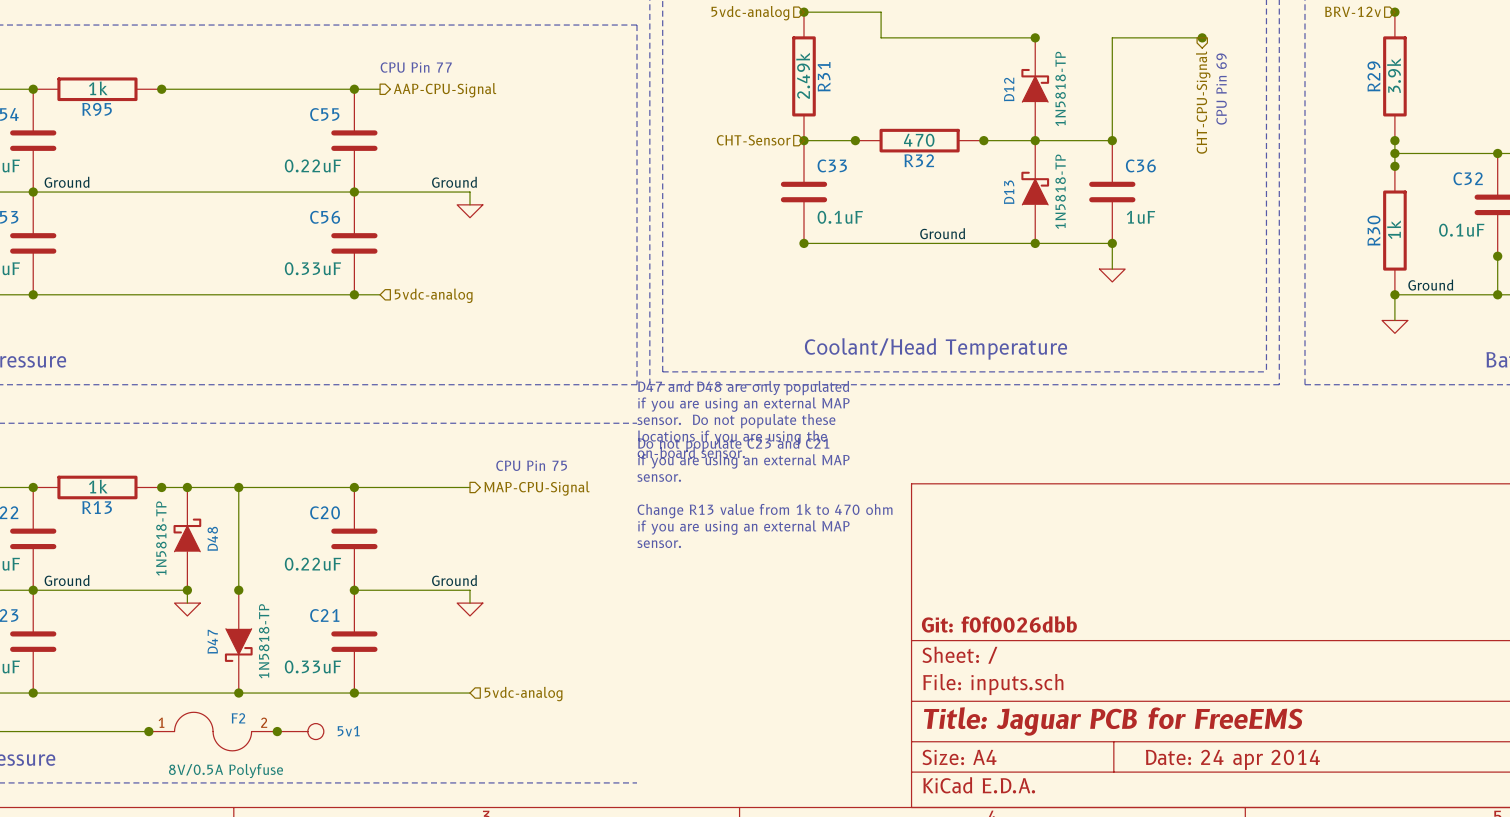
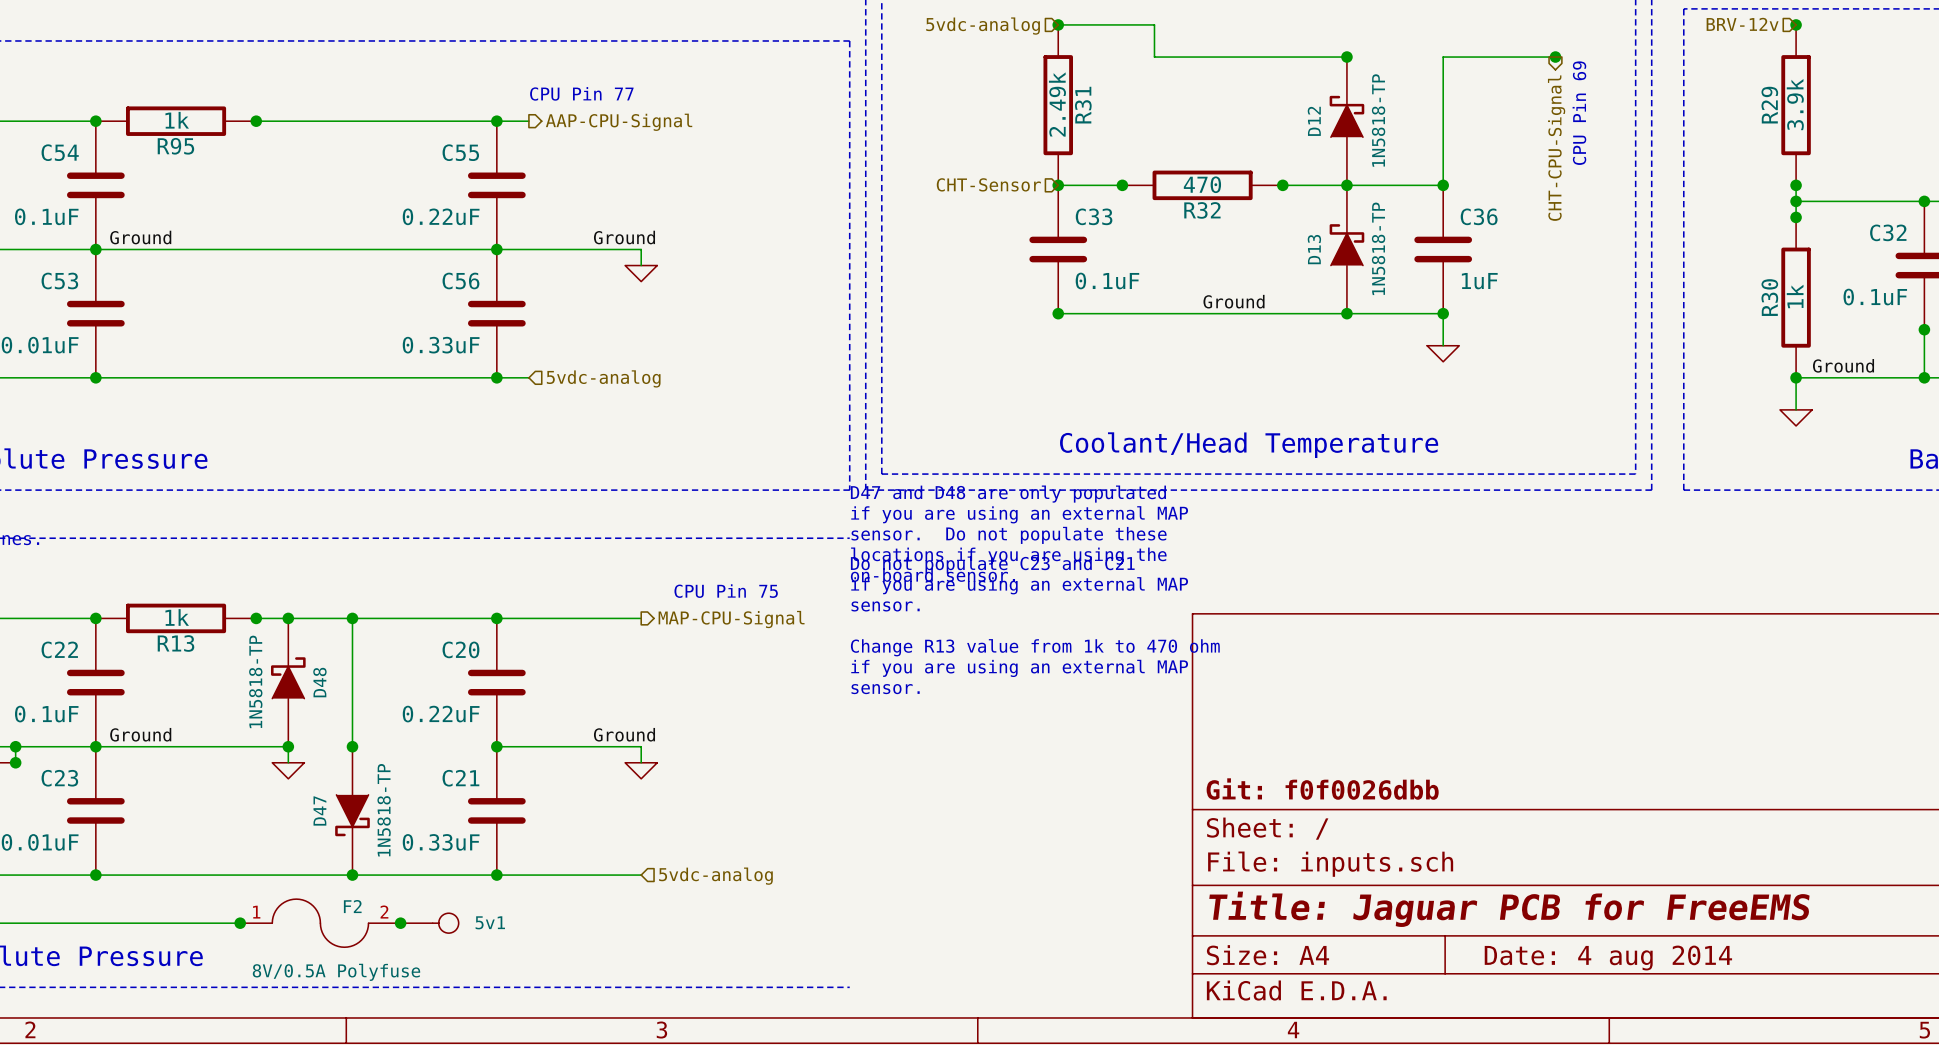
title block: Date: 24 apr 2014 (1232, 759) -> Date: 4 aug 2014 (1608, 958)

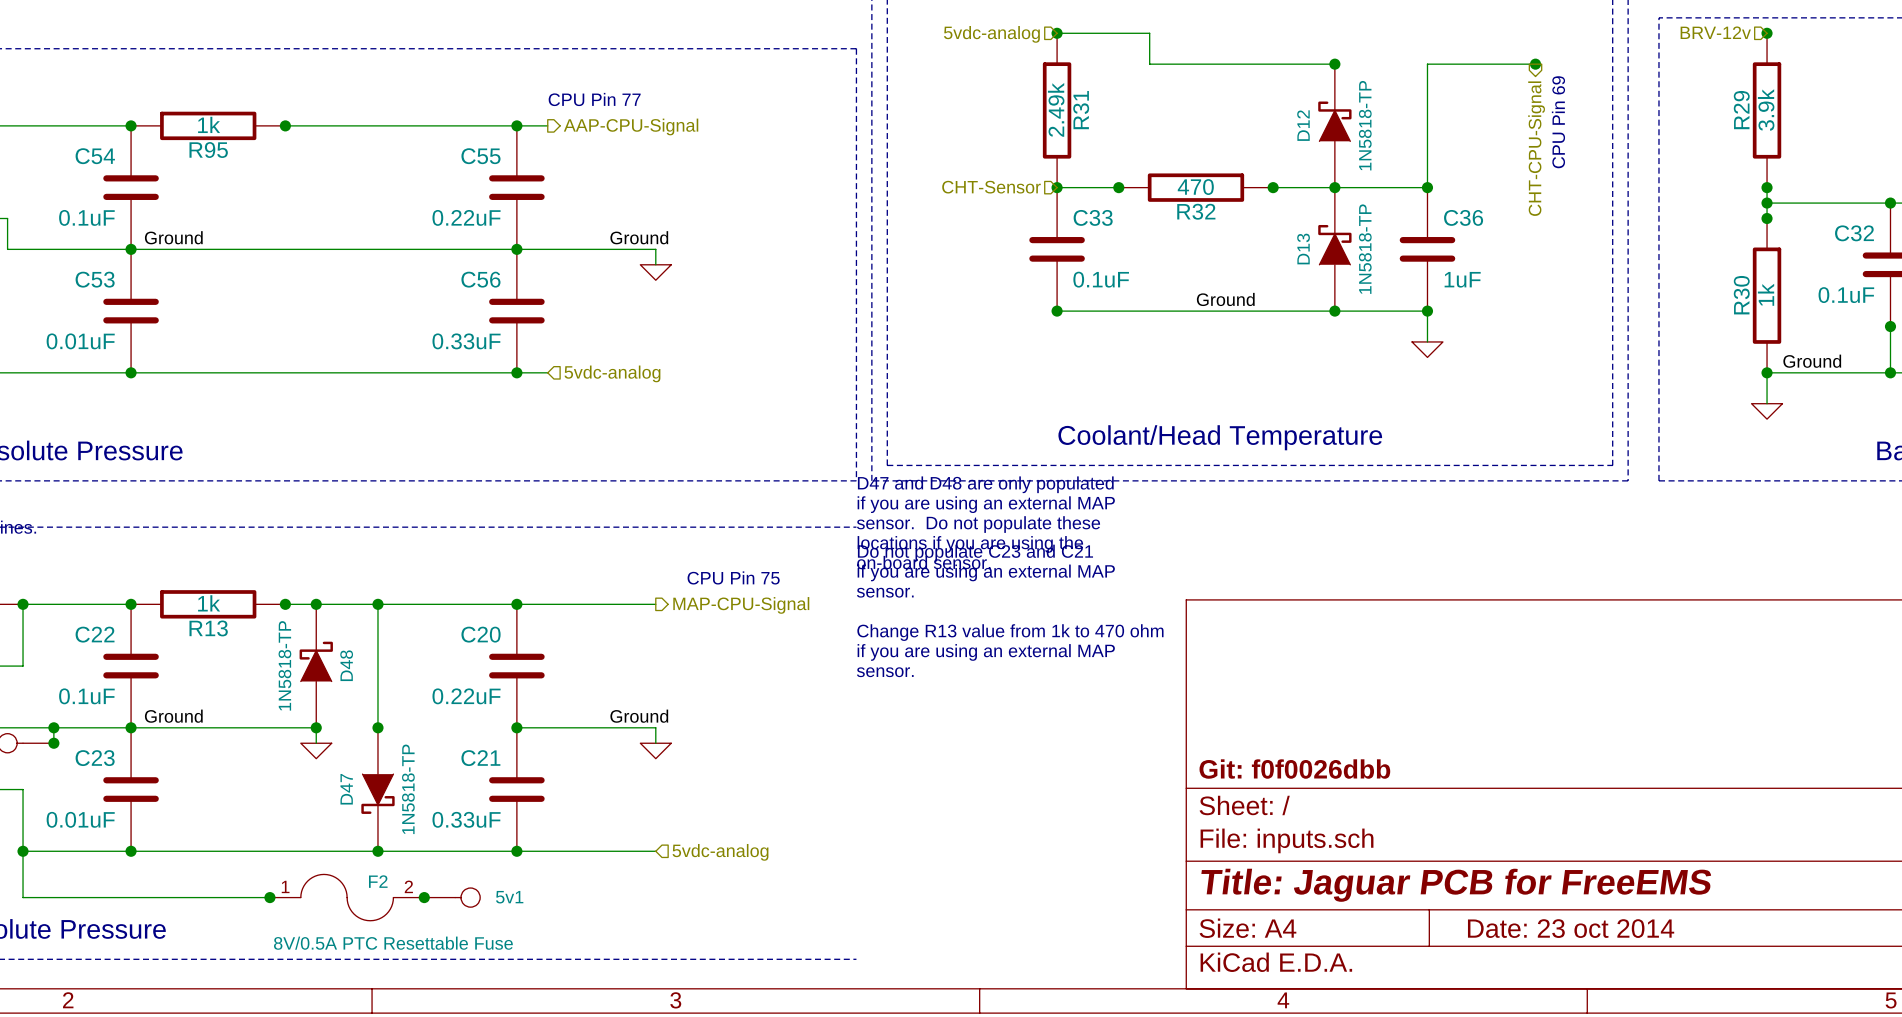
title block: Date: 4 aug 2014 (1608, 958) -> Date: 23 oct 2014 (1571, 928)
F2 value: 8V/0.5A Polyfuse (336, 972) -> 8V/0.5A PTC Resettable Fuse (393, 943)

